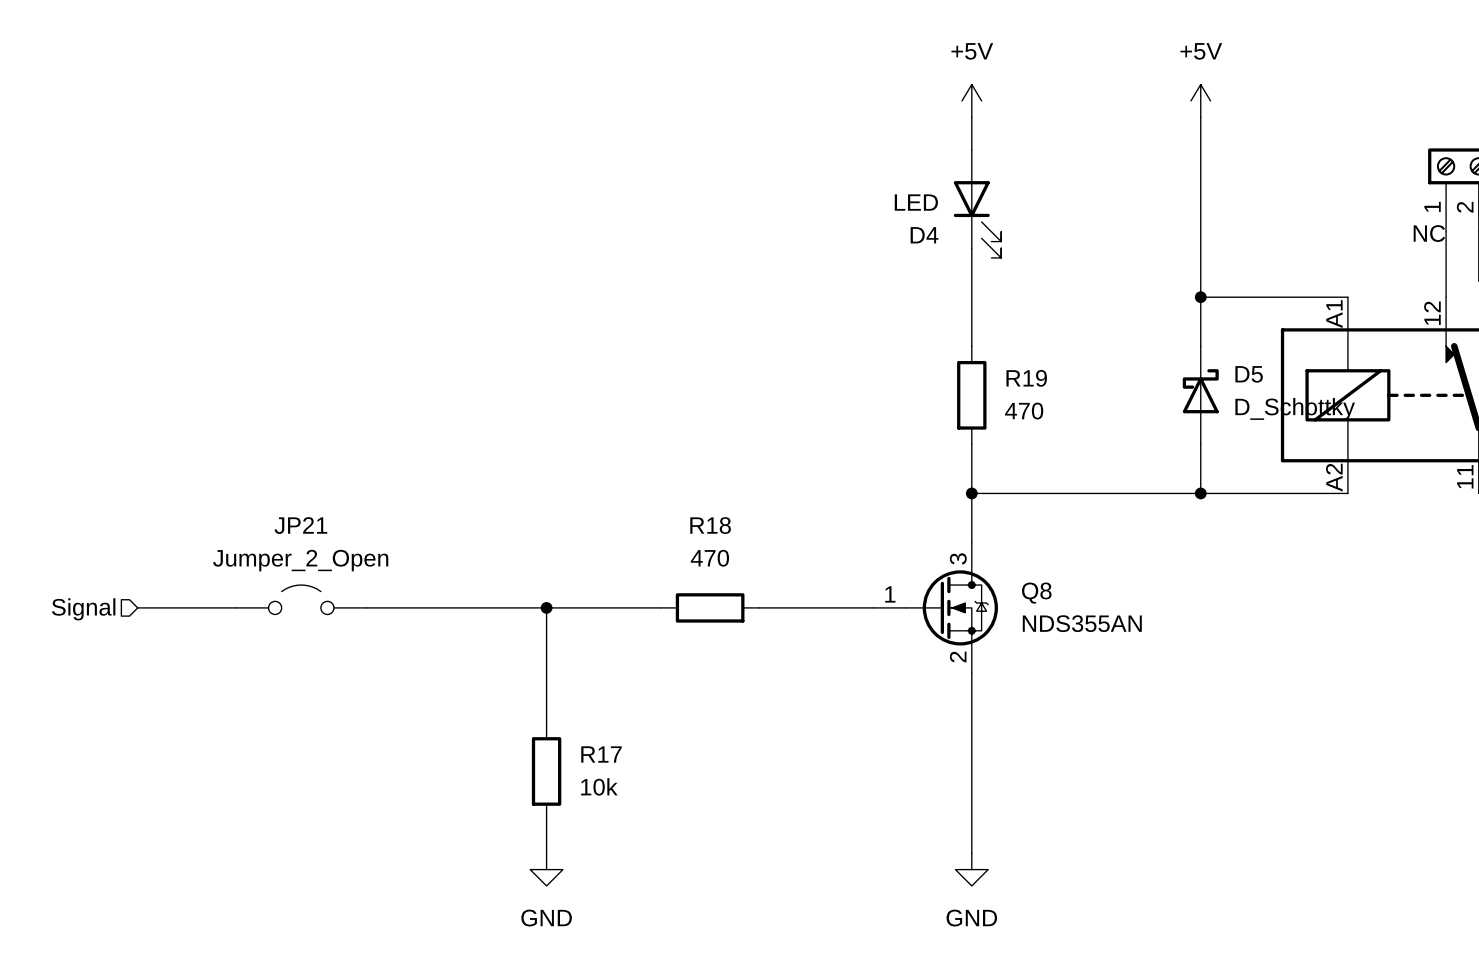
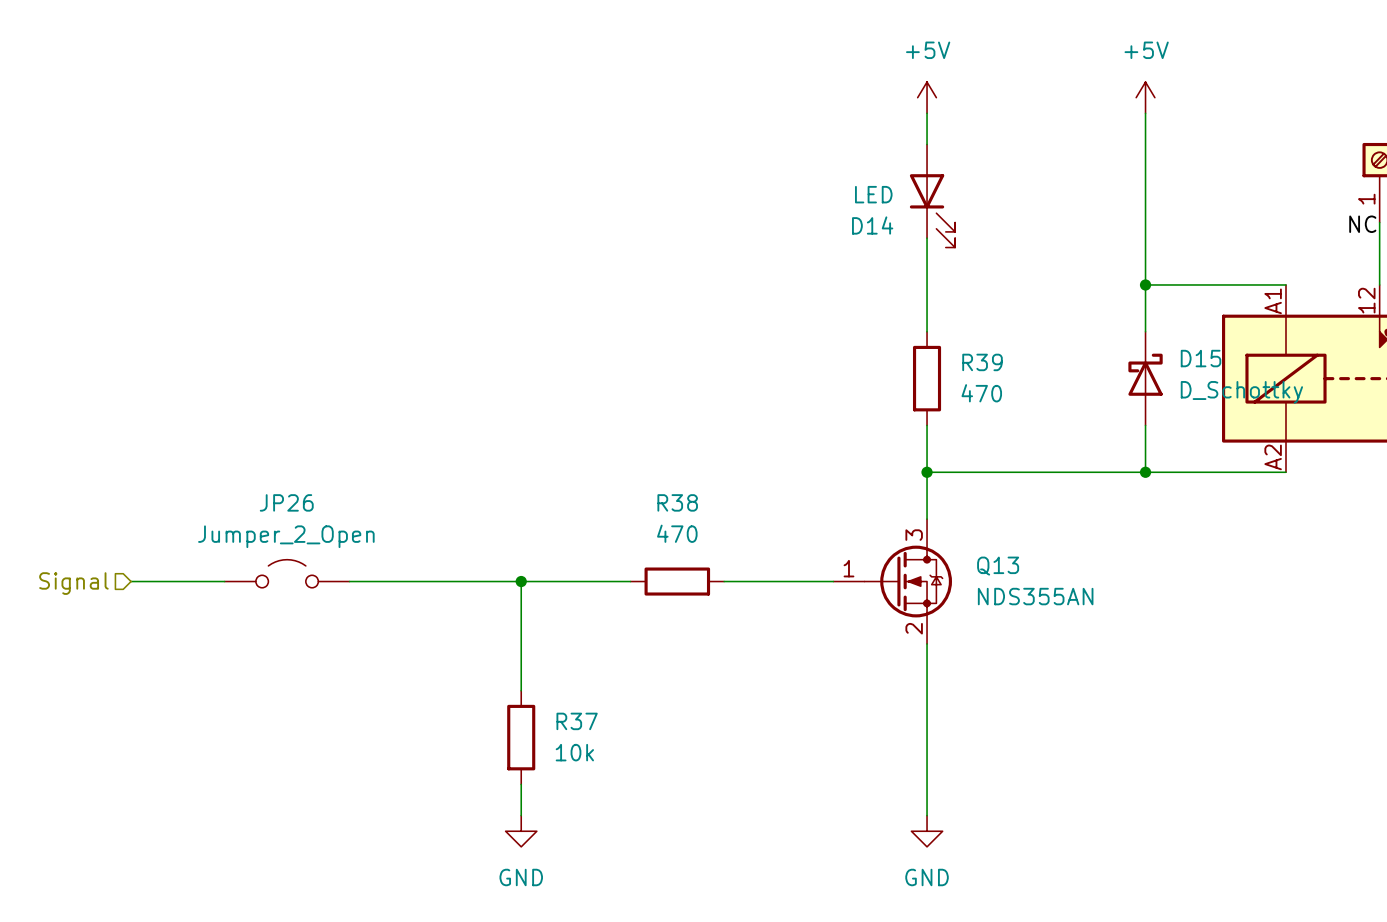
D4 name: D4 (924, 235) -> D14 (872, 225)
D5 name: D5 (1249, 374) -> D15 (1201, 358)
R19 name: R19 (1026, 378) -> R39 (982, 362)
JP21 name: JP21 (300, 525) -> JP26 (286, 502)
R18 name: R18 (710, 525) -> R38 (677, 502)
Q8 name: Q8 (1036, 593) -> Q13 (998, 566)
R17 name: R17 (601, 754) -> R37 (577, 721)

